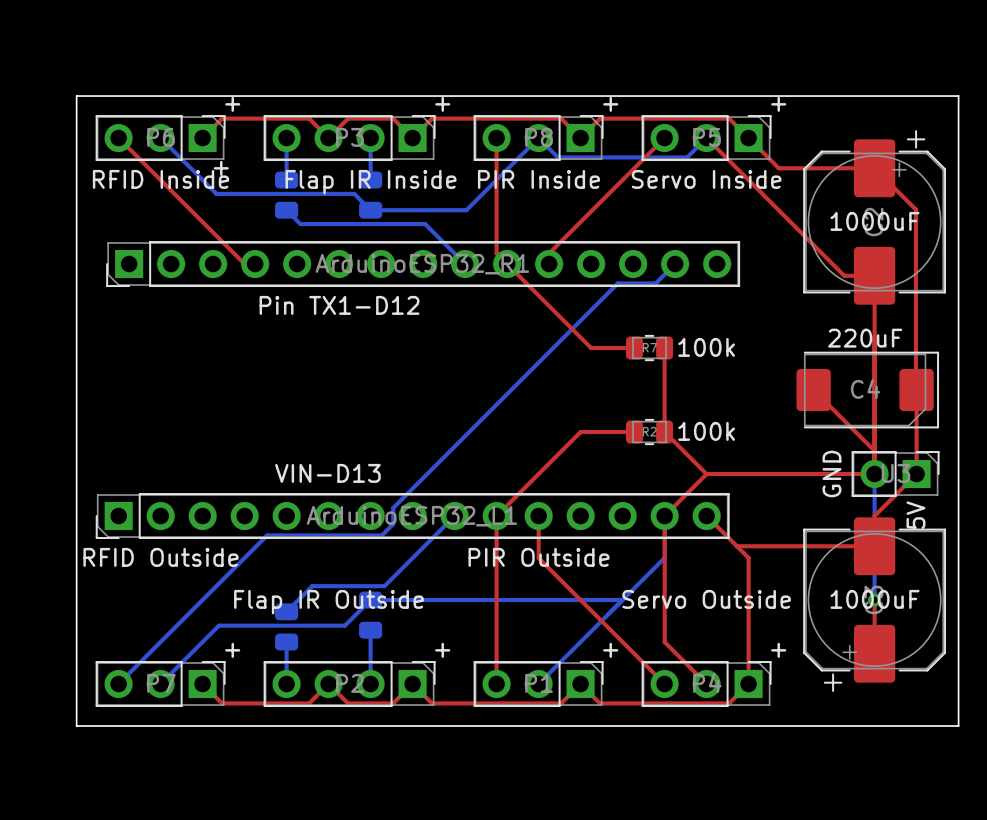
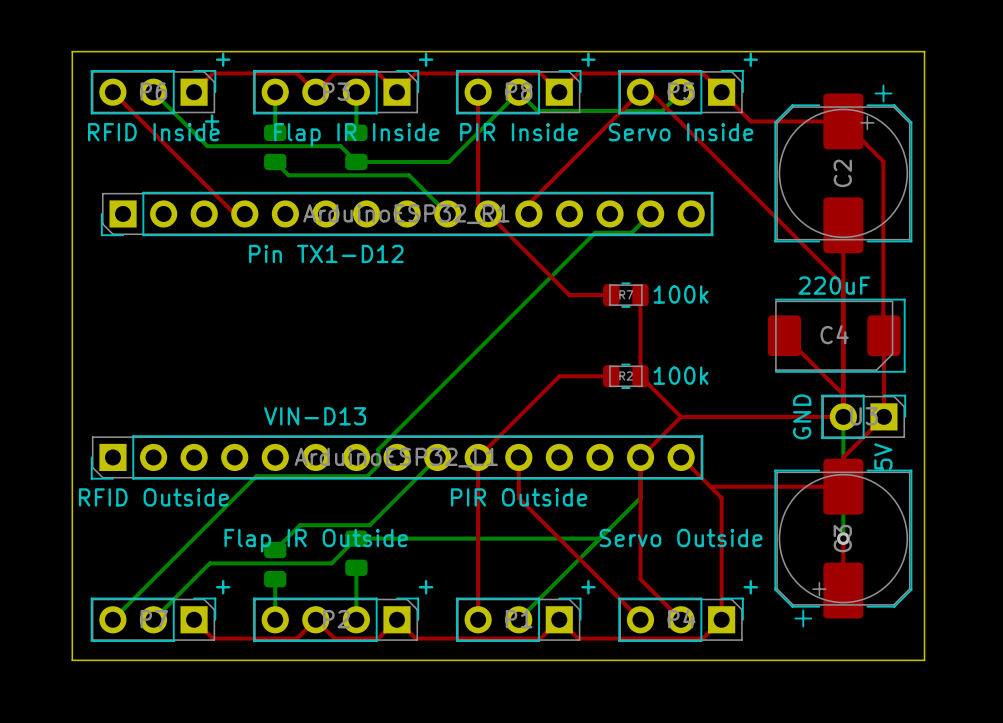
top track: none -> (650, 92) (843, 284)
top track: (706, 138) (844, 275) (874, 275) -> none
text: 1000uF (874, 221) -> none
text: 1000uF (874, 599) -> none

